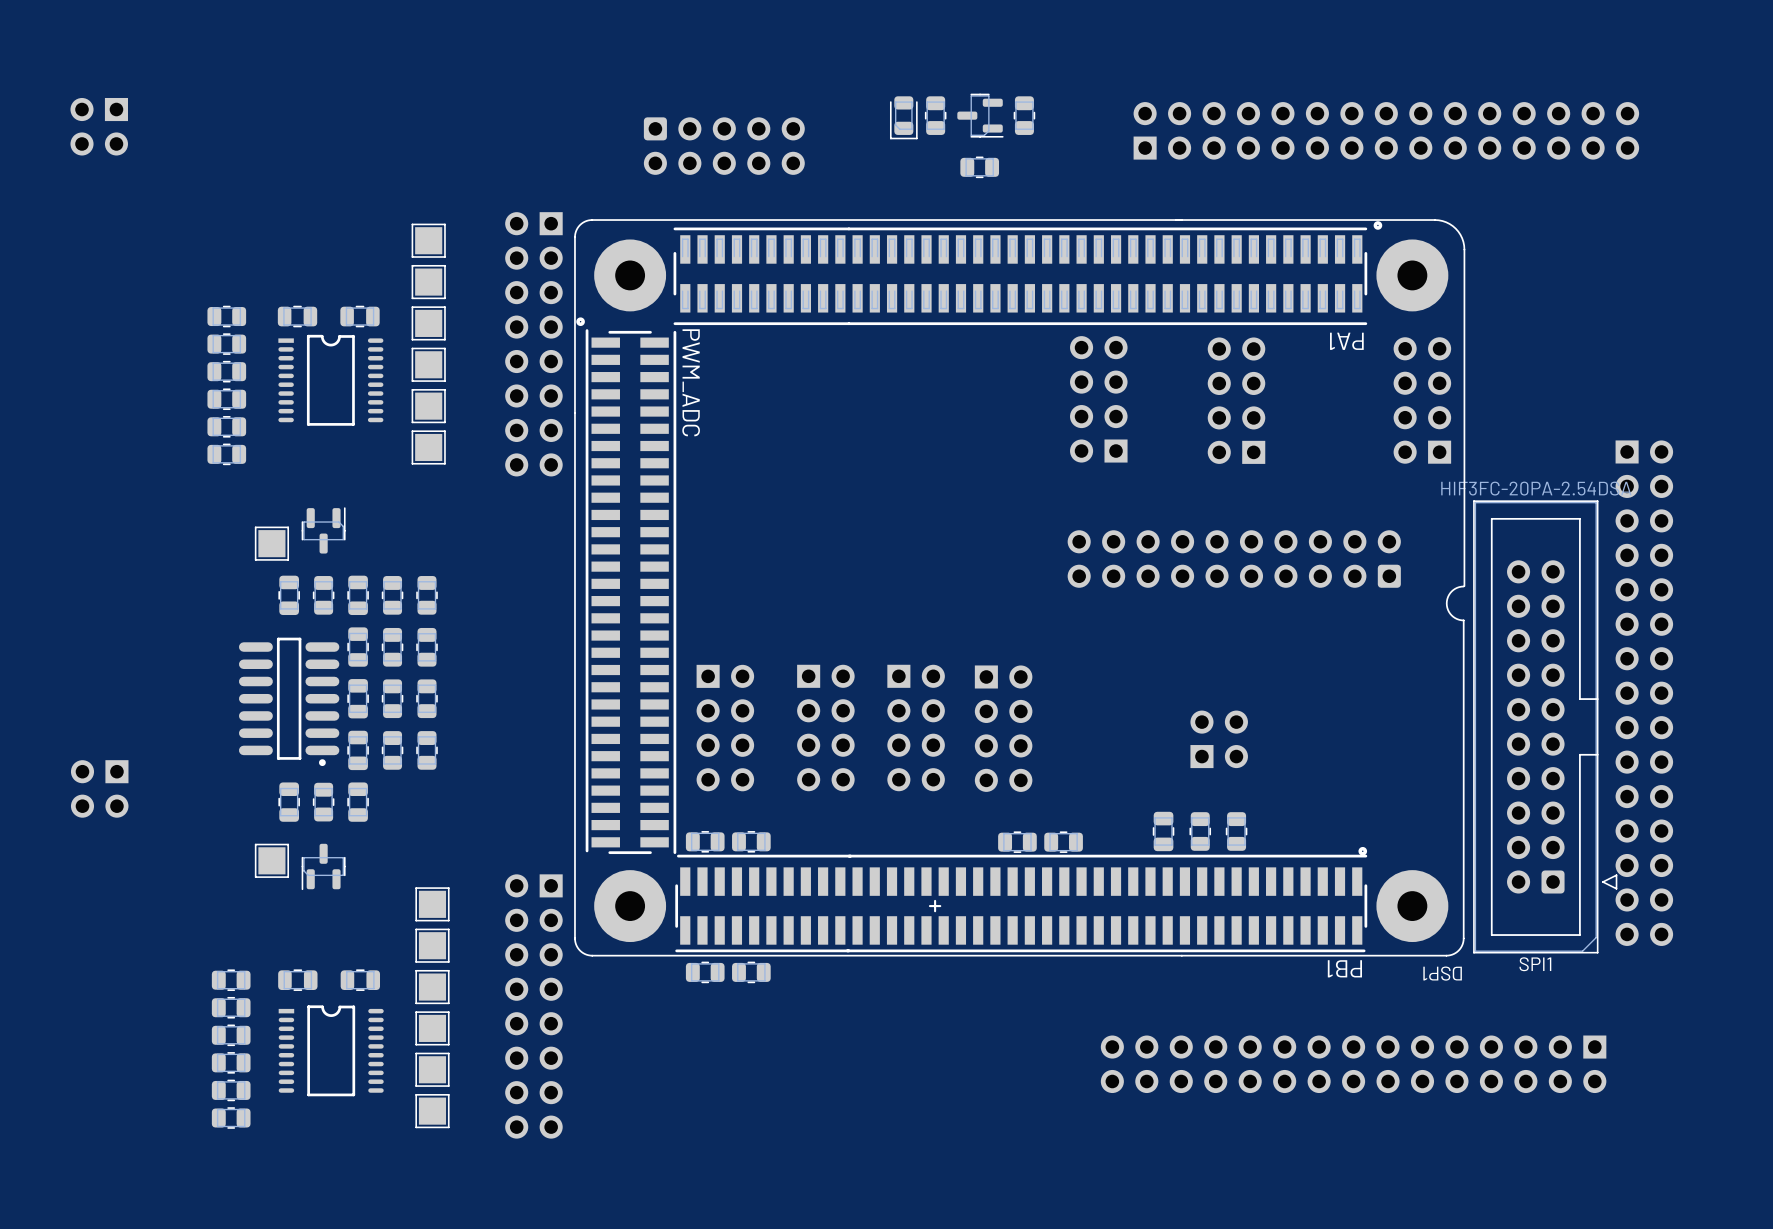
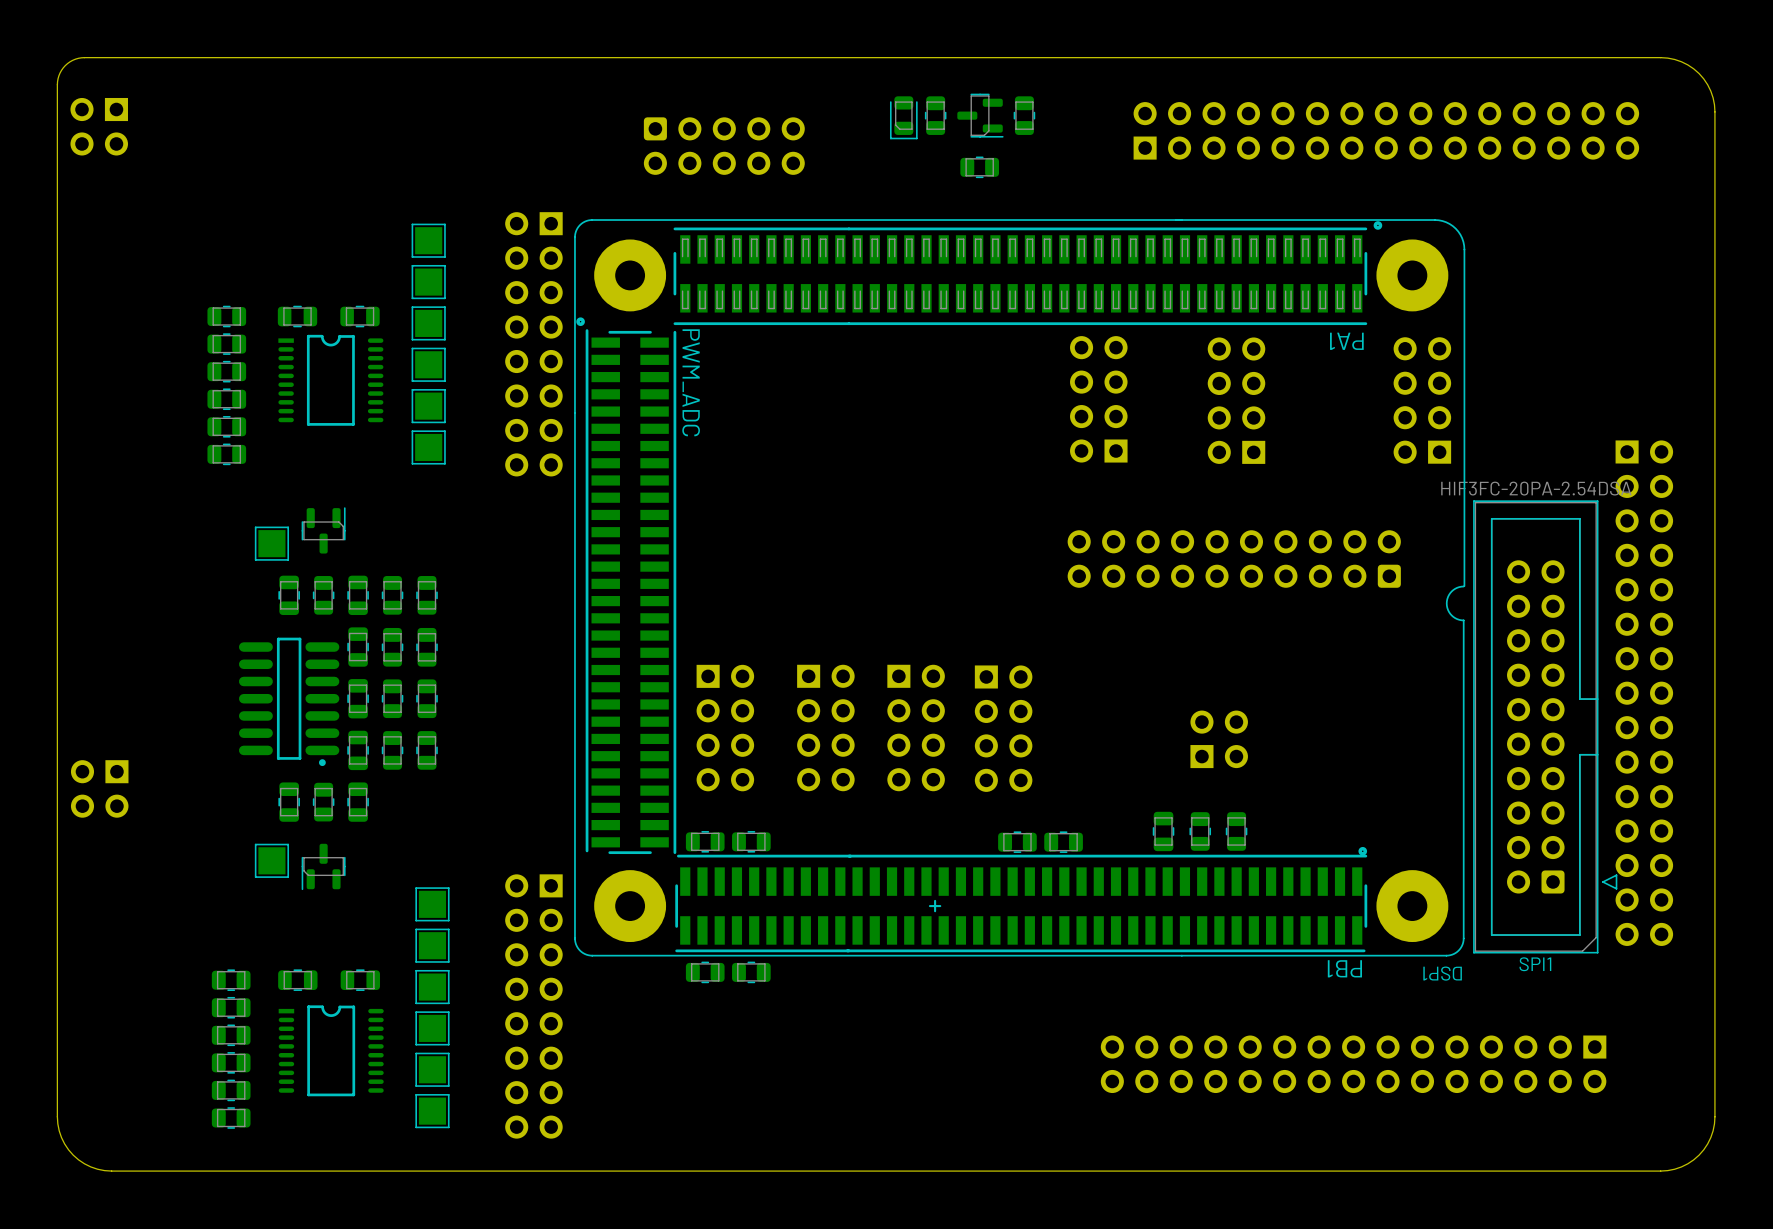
board edge: none -> (1660, 57) (84, 57) (70, 61) (60, 73) (57, 84) (57, 1116) (59, 1130) (68, 1149) (84, 1163) (97, 1169) (111, 1171) (1660, 1171) (1674, 1169) (1693, 1159) (1707, 1143) (1713, 1130) (1714, 1116) (1714, 111) (1710, 91) (1699, 73) (1681, 61) (1660, 57)

